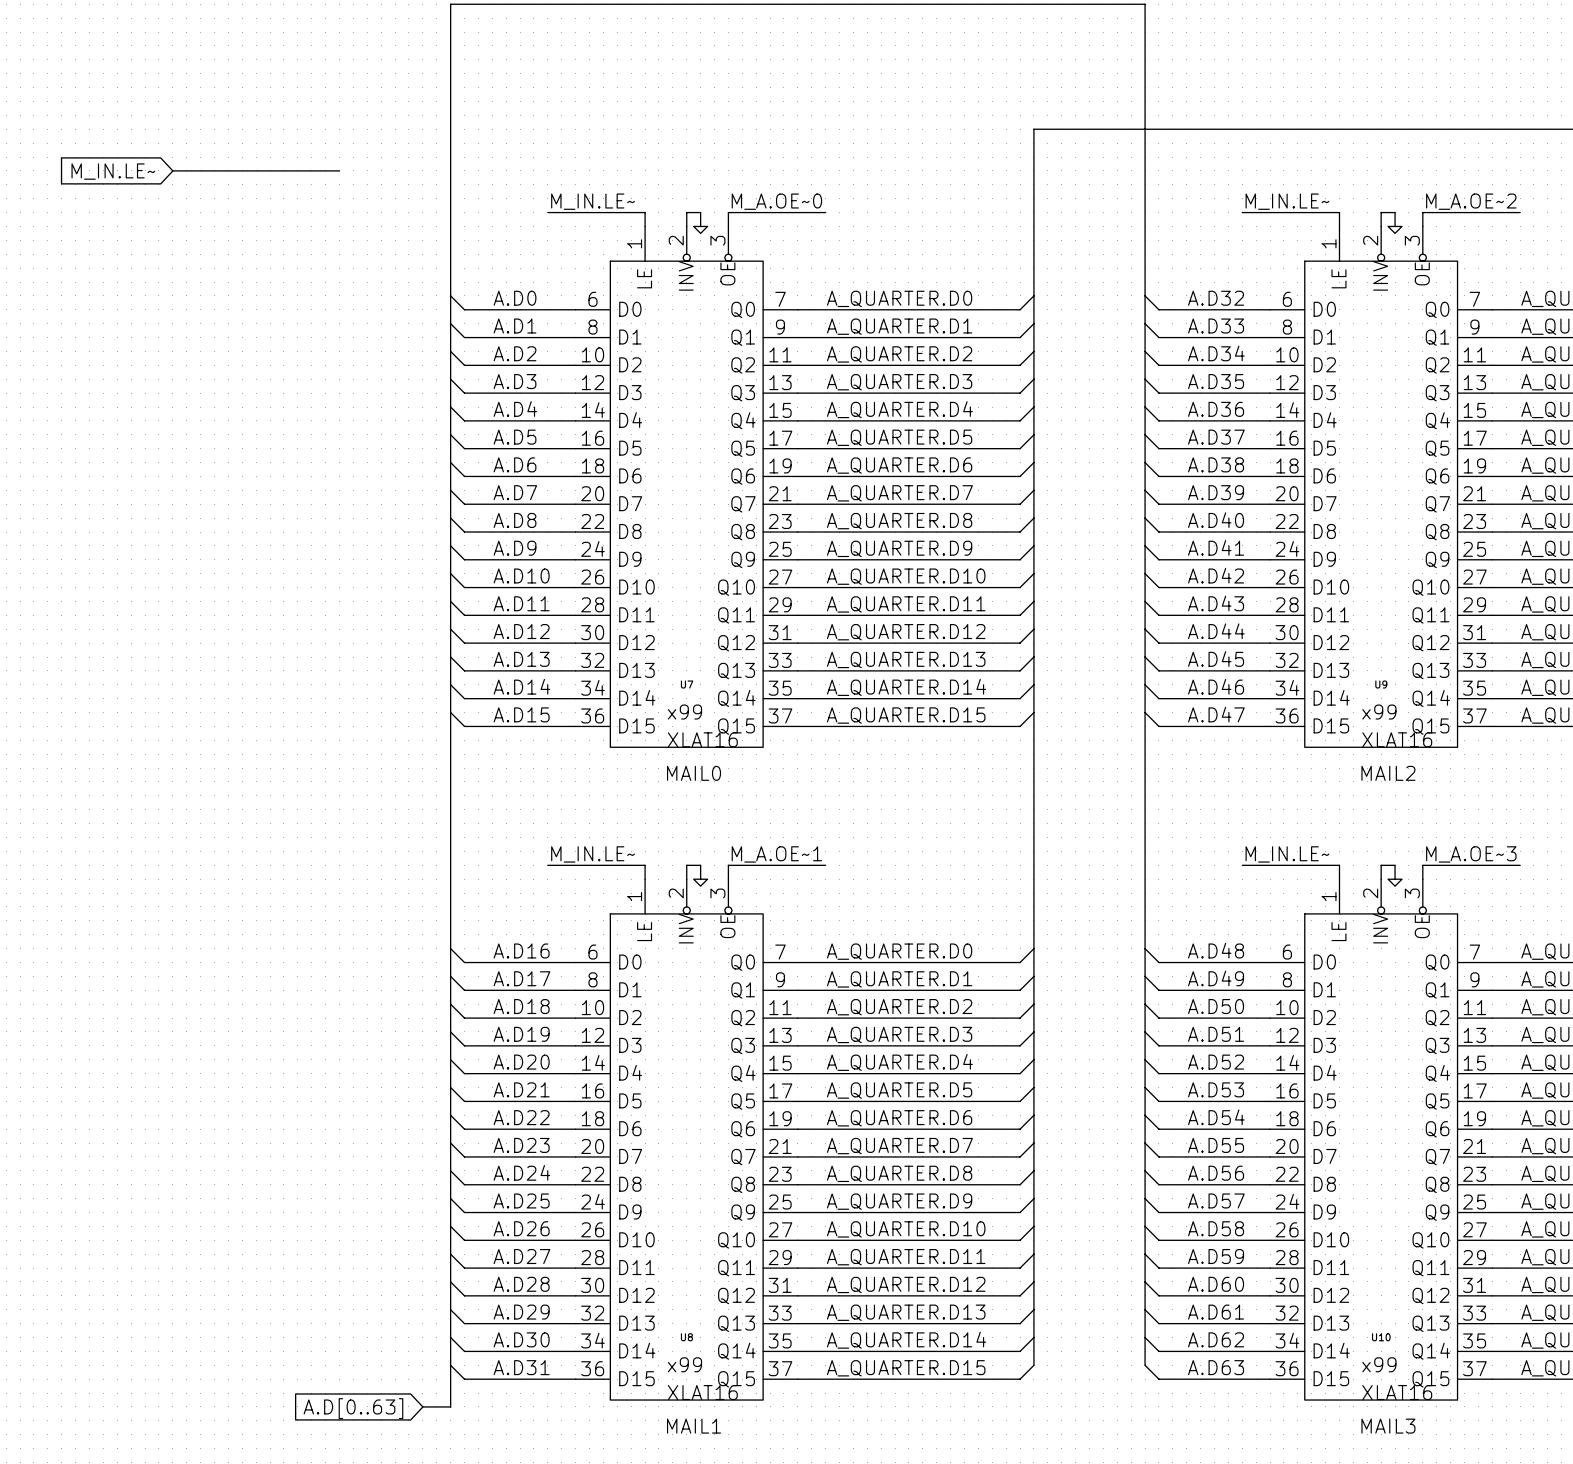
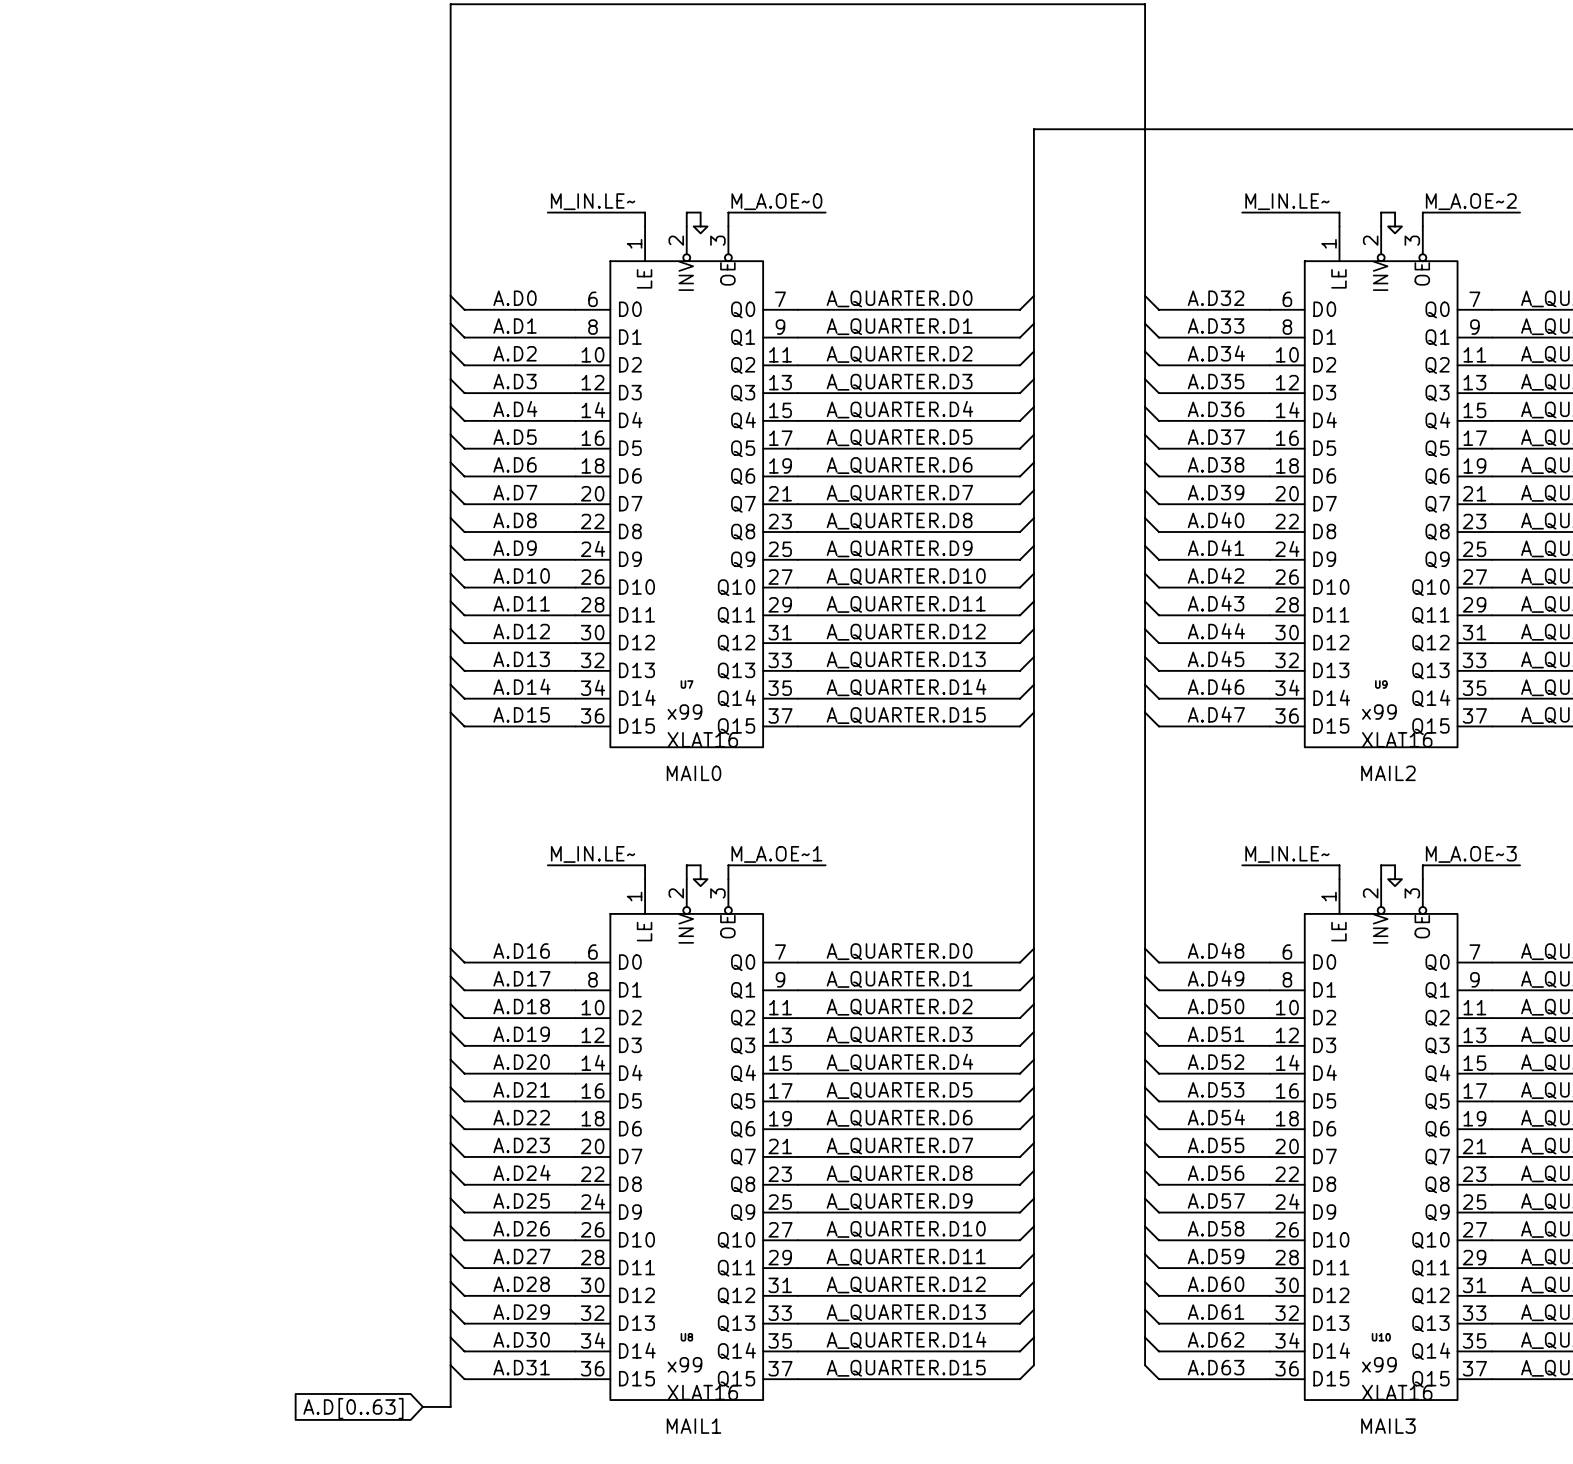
wire: (172, 170) (339, 170) -> none
global label: M_IN.LE~ (113, 171) -> none

